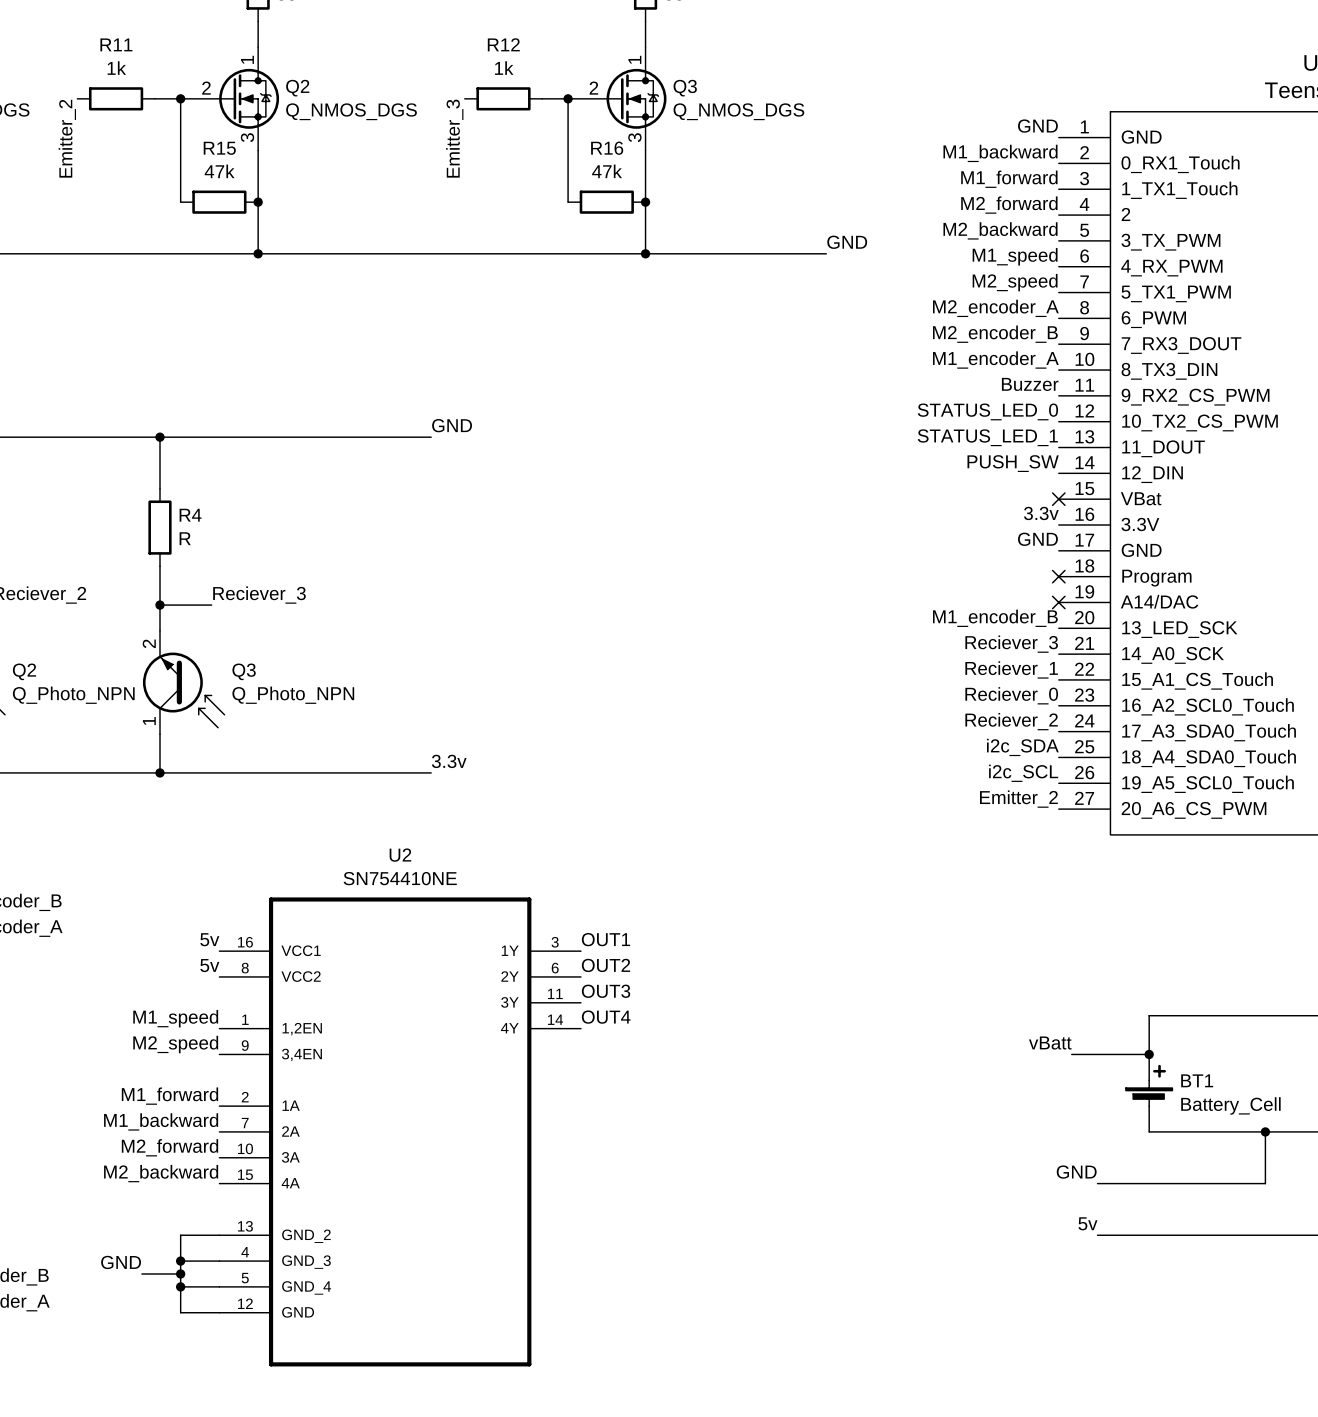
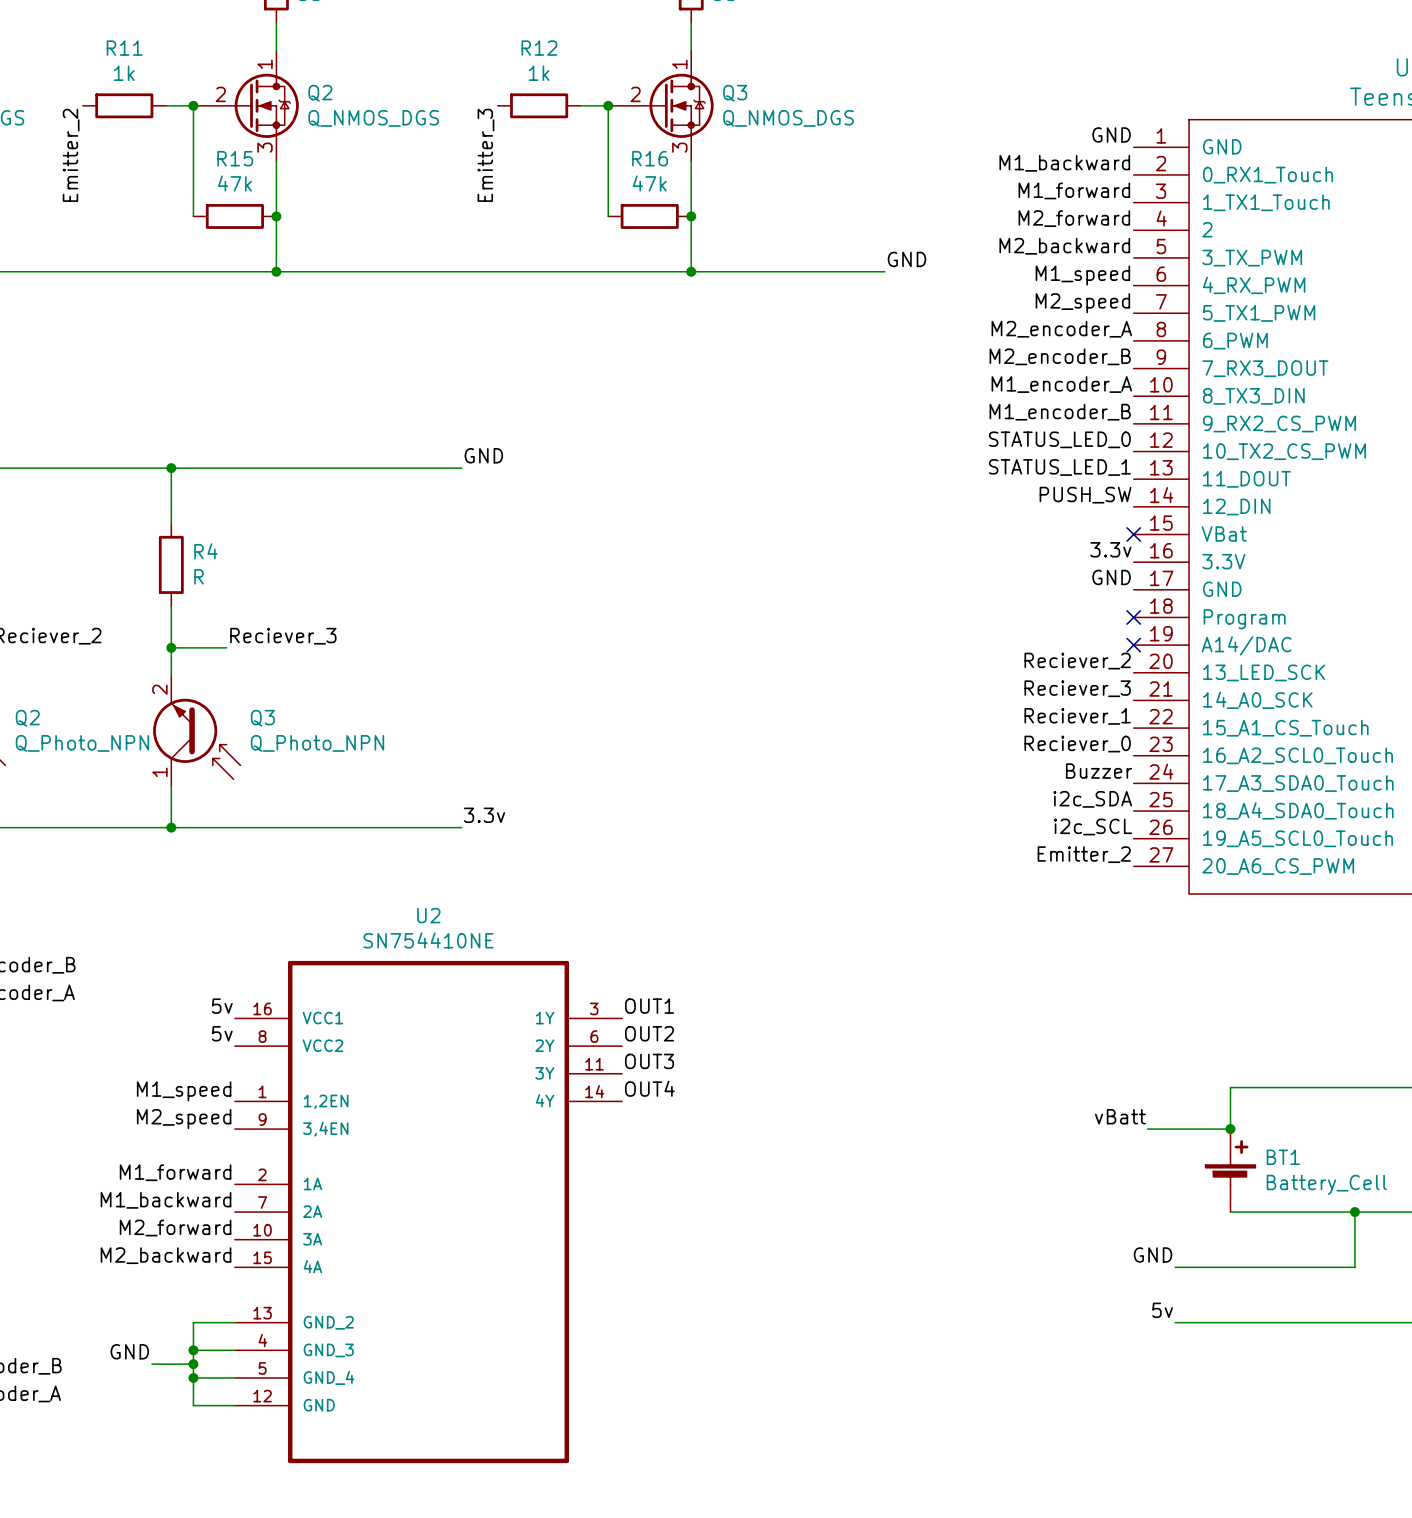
label: Buzzer (1030, 384) -> M1_encoder_B (1060, 412)
label: M1_encoder_B (995, 618) -> Reciever_2 (1077, 661)
label: Reciever_2 (1011, 721) -> Buzzer (1099, 771)

